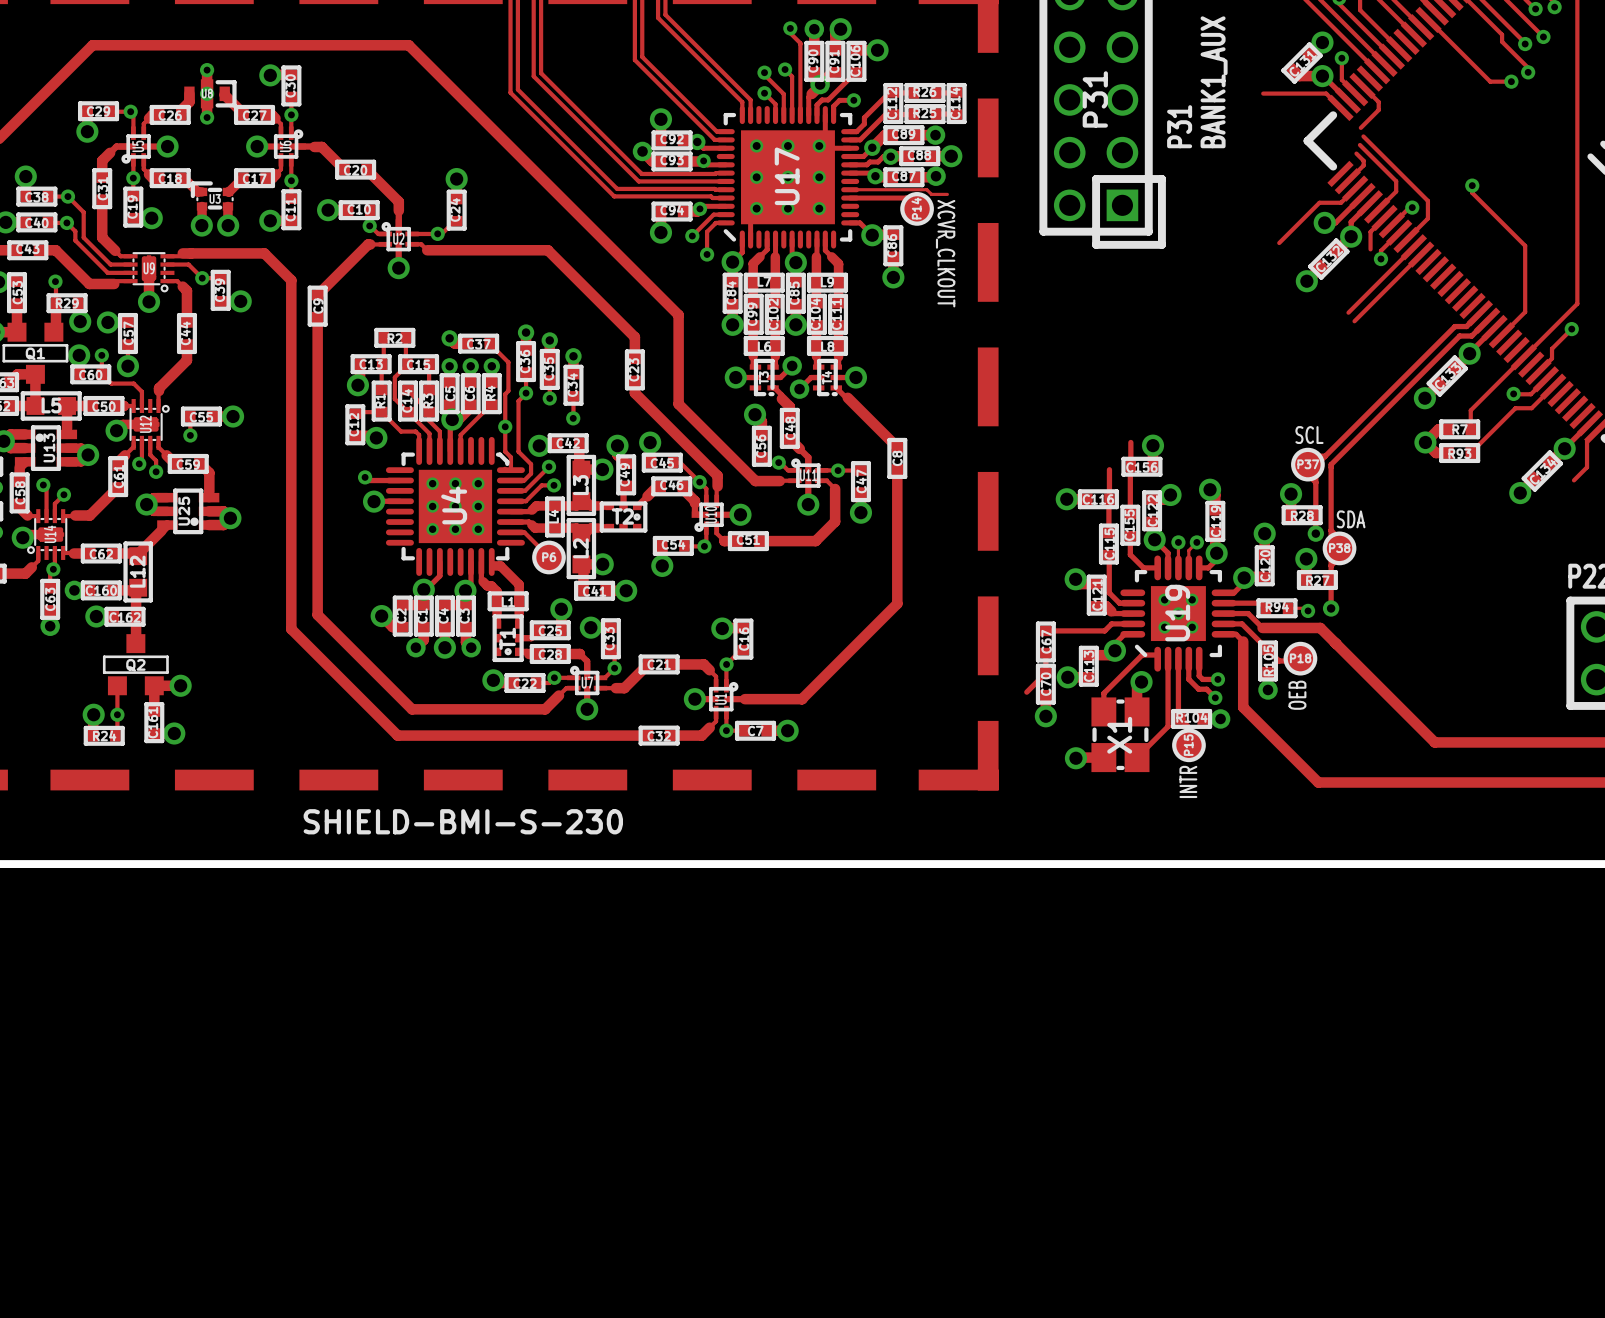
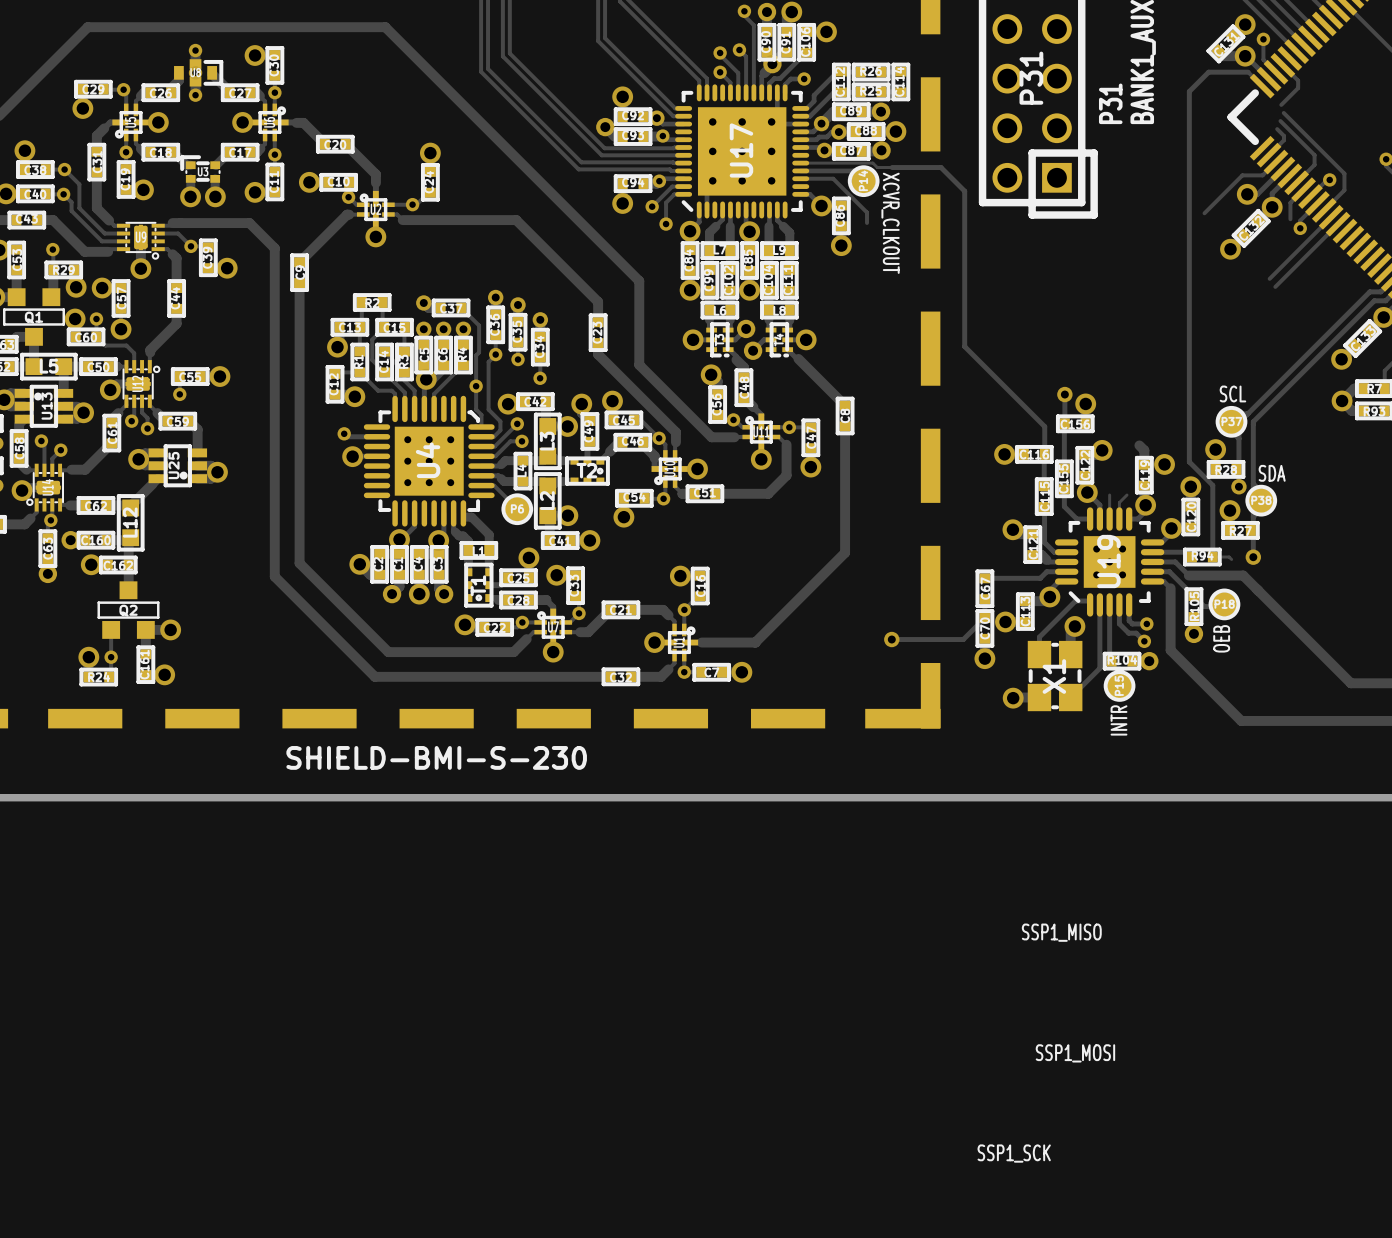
track: (1263, 93) (1326, 93) -> (1212, 557) (1212, 485) (1189, 461) (1189, 91) (1208, 72) (1248, 72)
track: none -> (892, 167) (941, 167) (964, 191) (964, 346) (1044, 426)
track: none -> (800, 178) (833, 178) (867, 212) (867, 222)
via: none -> (1064, 394)
via position: (1210, 489) -> (1164, 464)
via: (1178, 542) -> none
via: (1196, 542) -> none
via: (1308, 610) -> none
track: none -> (966, 635) (963, 639) (891, 639)
via: none -> (891, 639)
text: none -> SSP1_MISO (1061, 932)
text: none -> SSP1_MOSI (1075, 1053)
text: none -> SSP1_SCK (1014, 1153)

